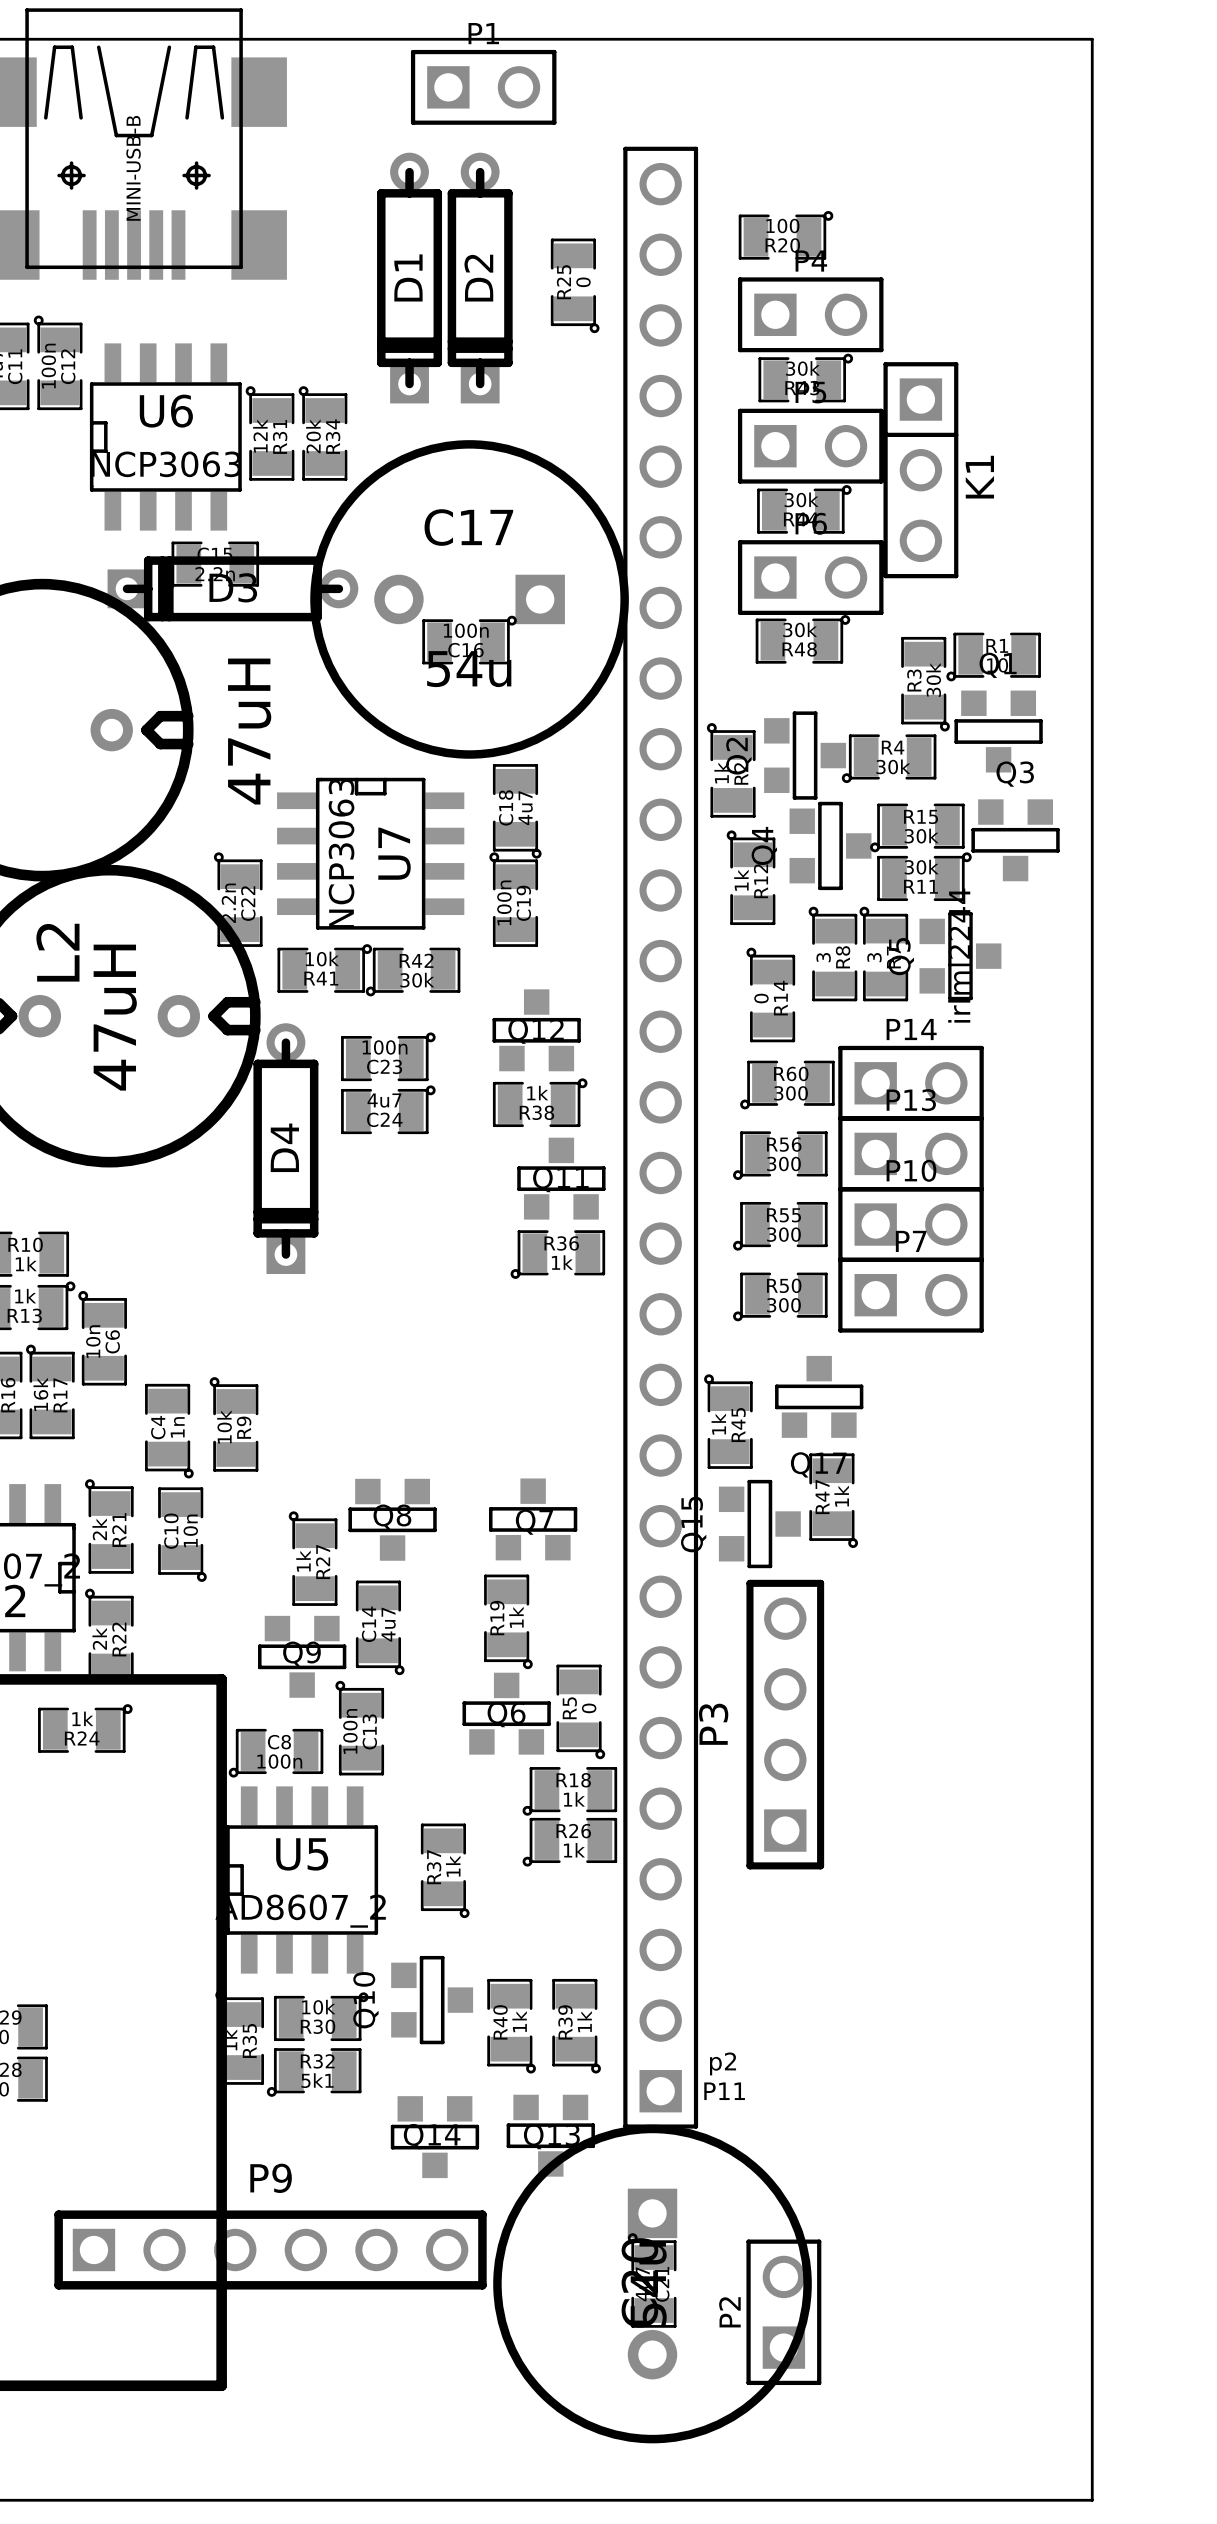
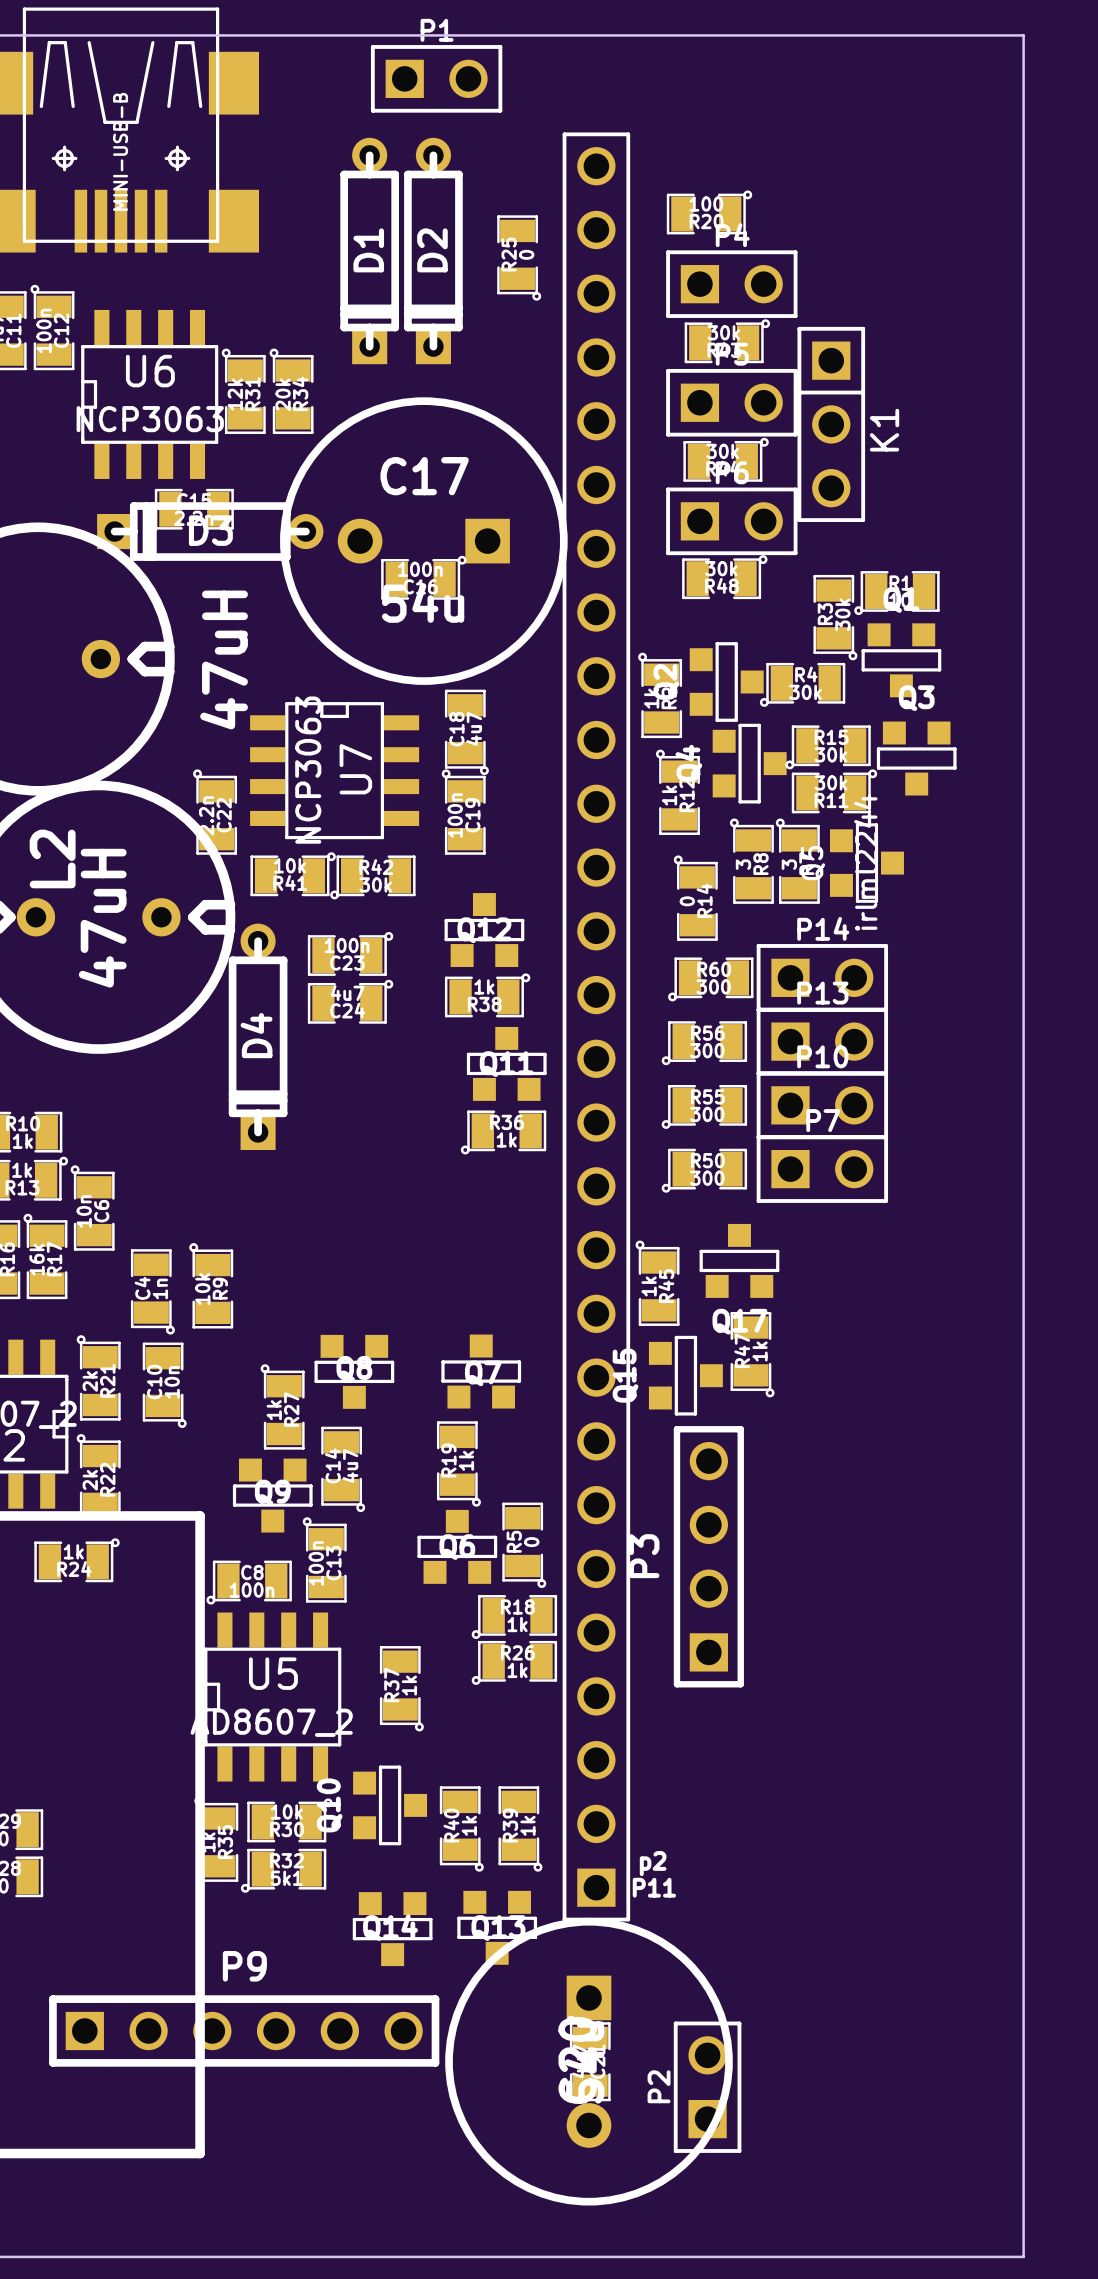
board edge: (1092, 39) (1092, 2500) -> (985, 35) (1023, 35) (1023, 2256) (985, 2256)

